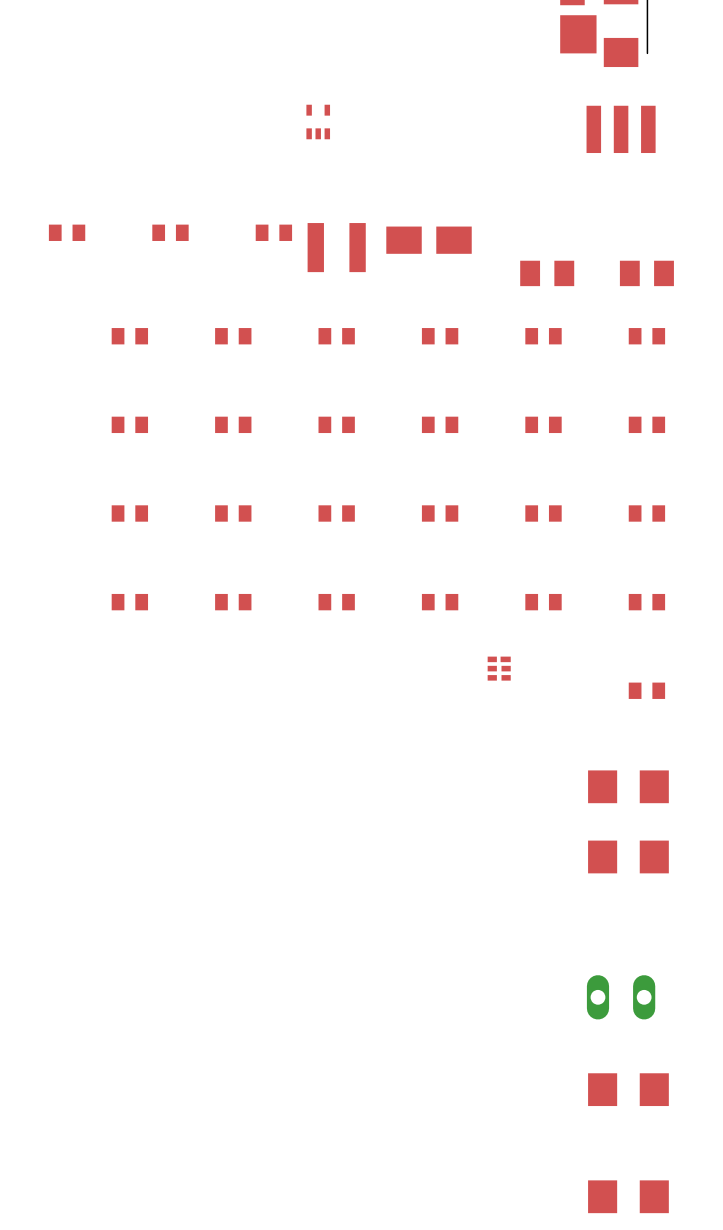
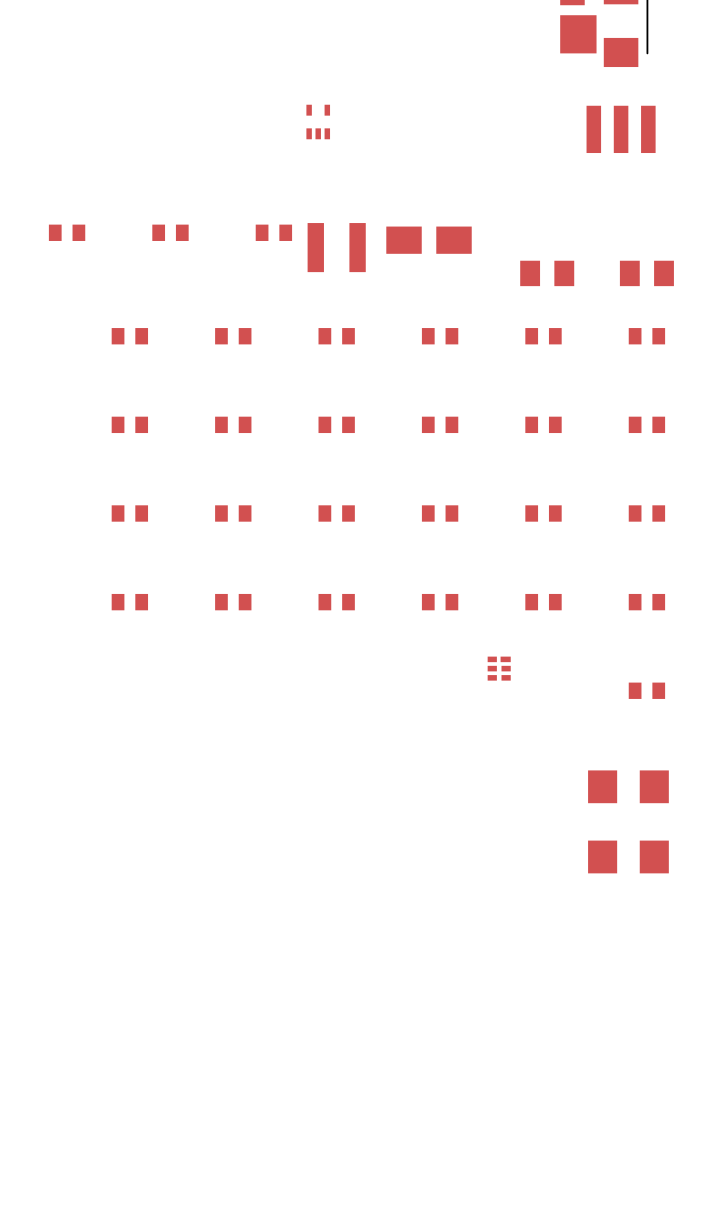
part: (621, 997) -> none
part: (628, 1089) -> none
part: (628, 1196) -> none

